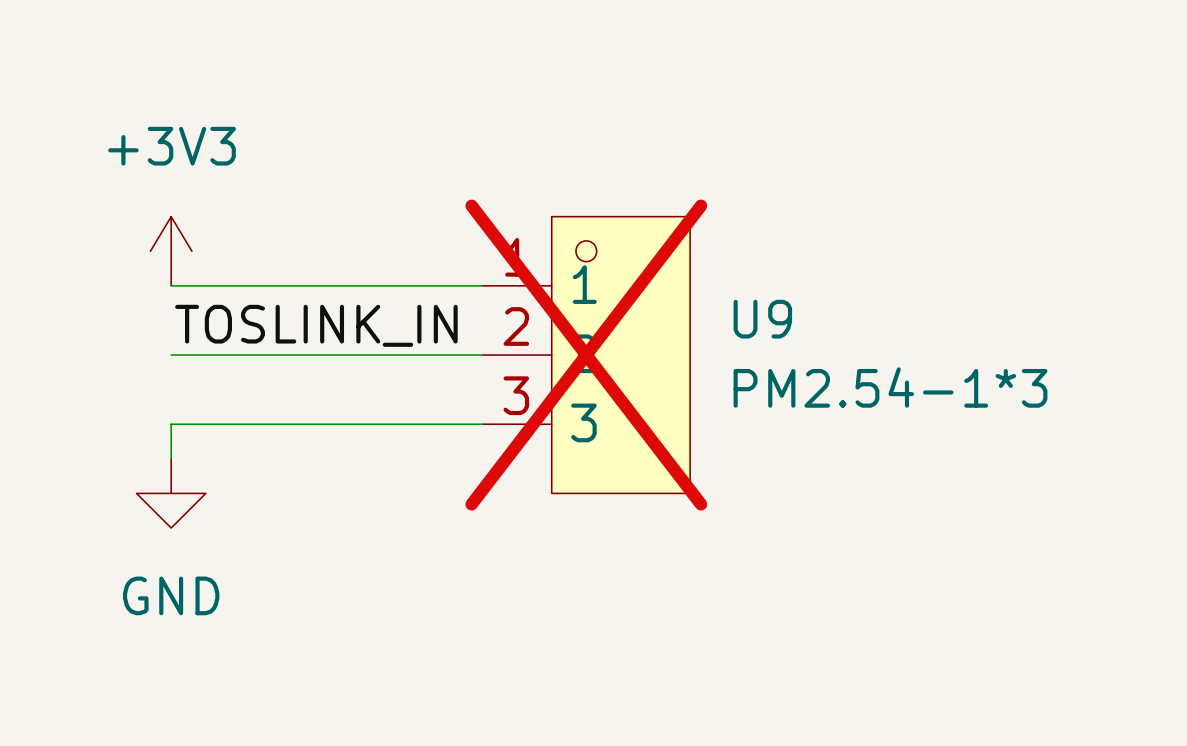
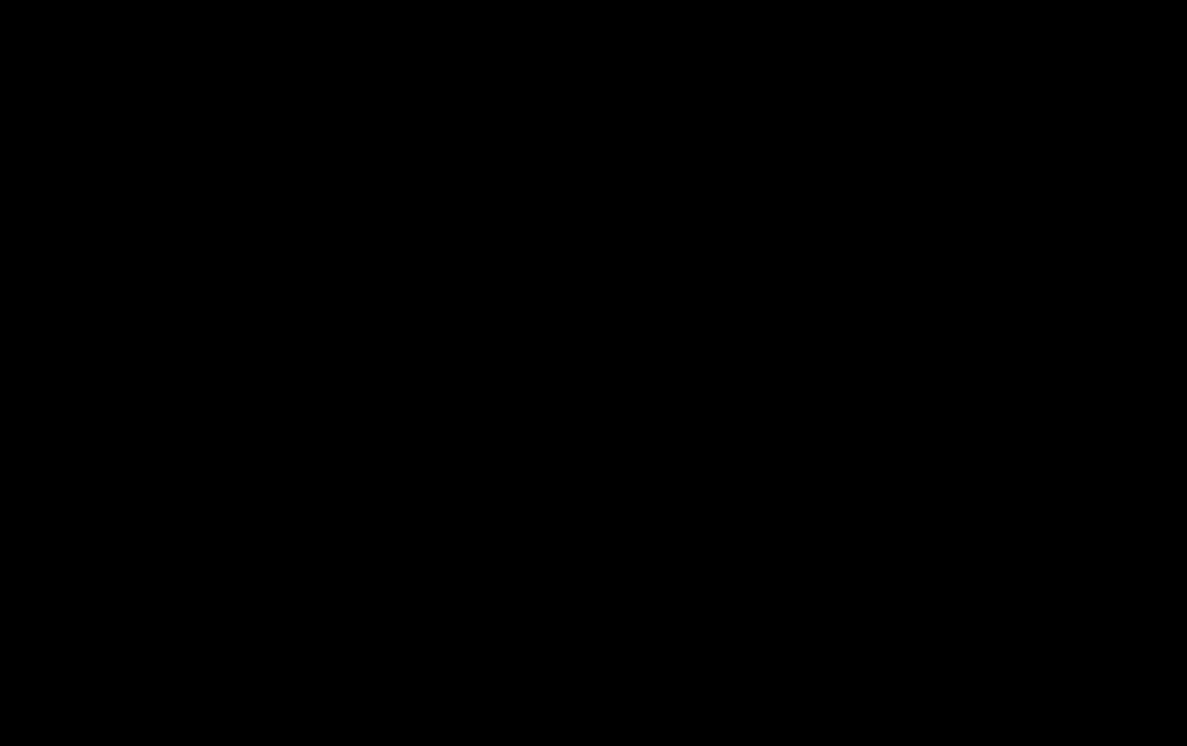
power symbol: +3V3 (171, 251) -> none
wire: (171, 285) (482, 285) -> none
label: TOSLINK_IN (316, 325) -> none
wire: (171, 355) (482, 355) -> none
U9: PM2.54-1*3 (586, 355) -> none
wire: (482, 424) (171, 424) (171, 458) -> none
power symbol: GND (171, 493) -> none

